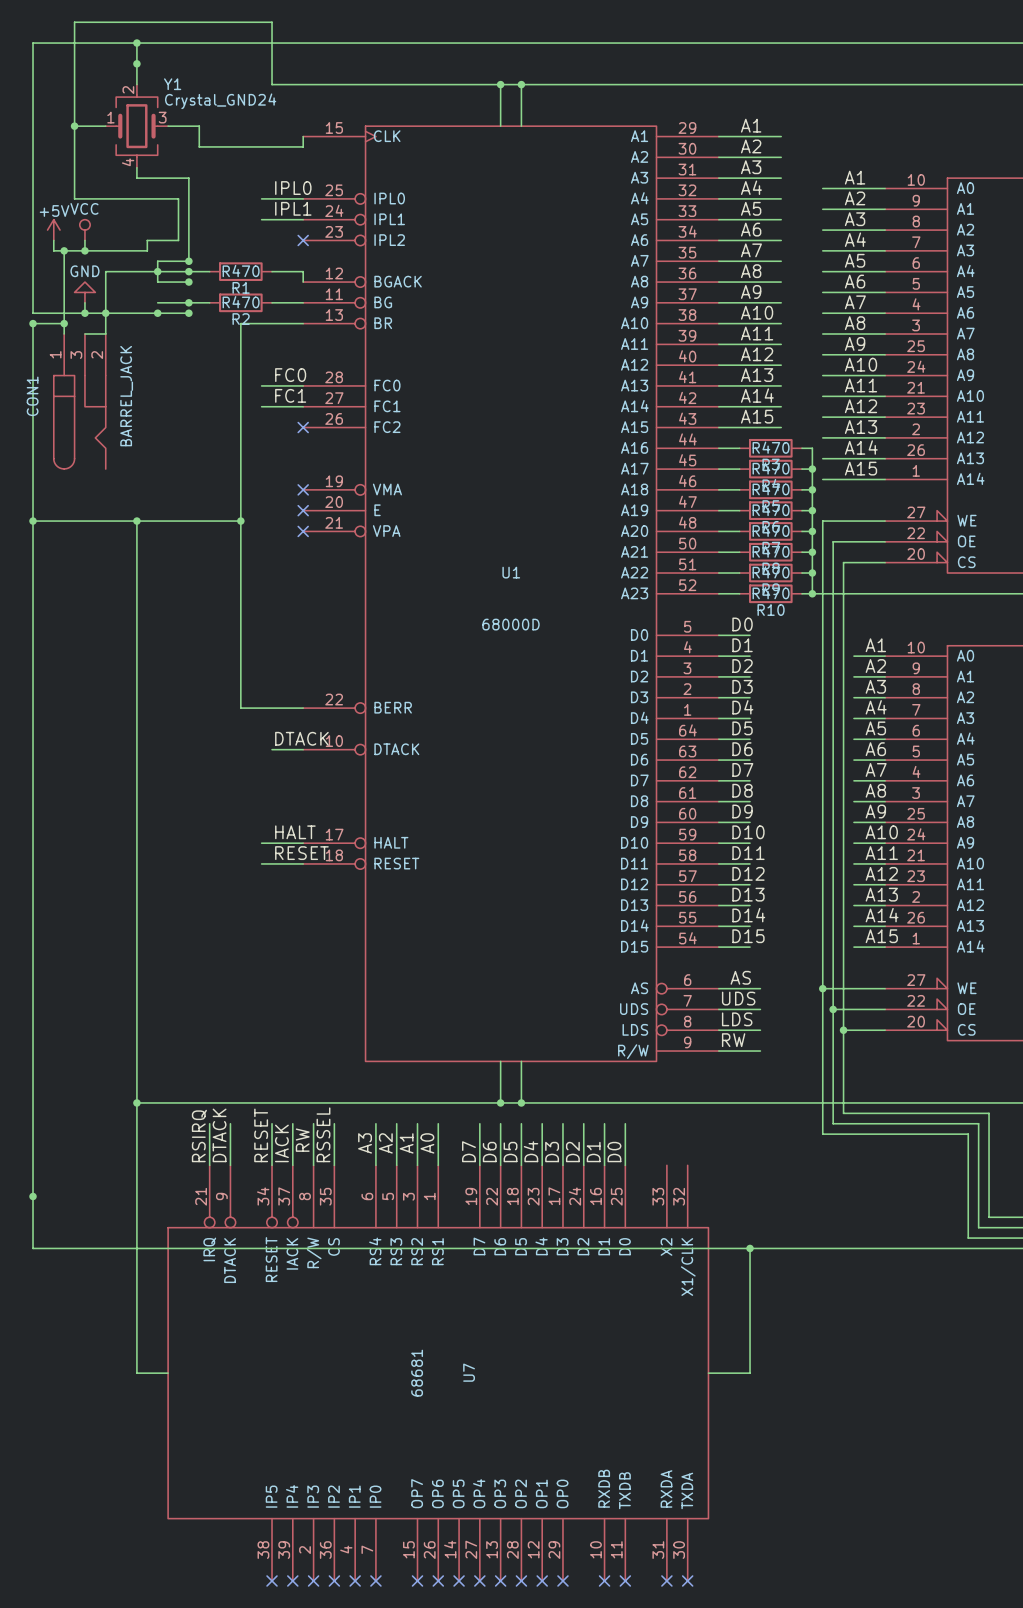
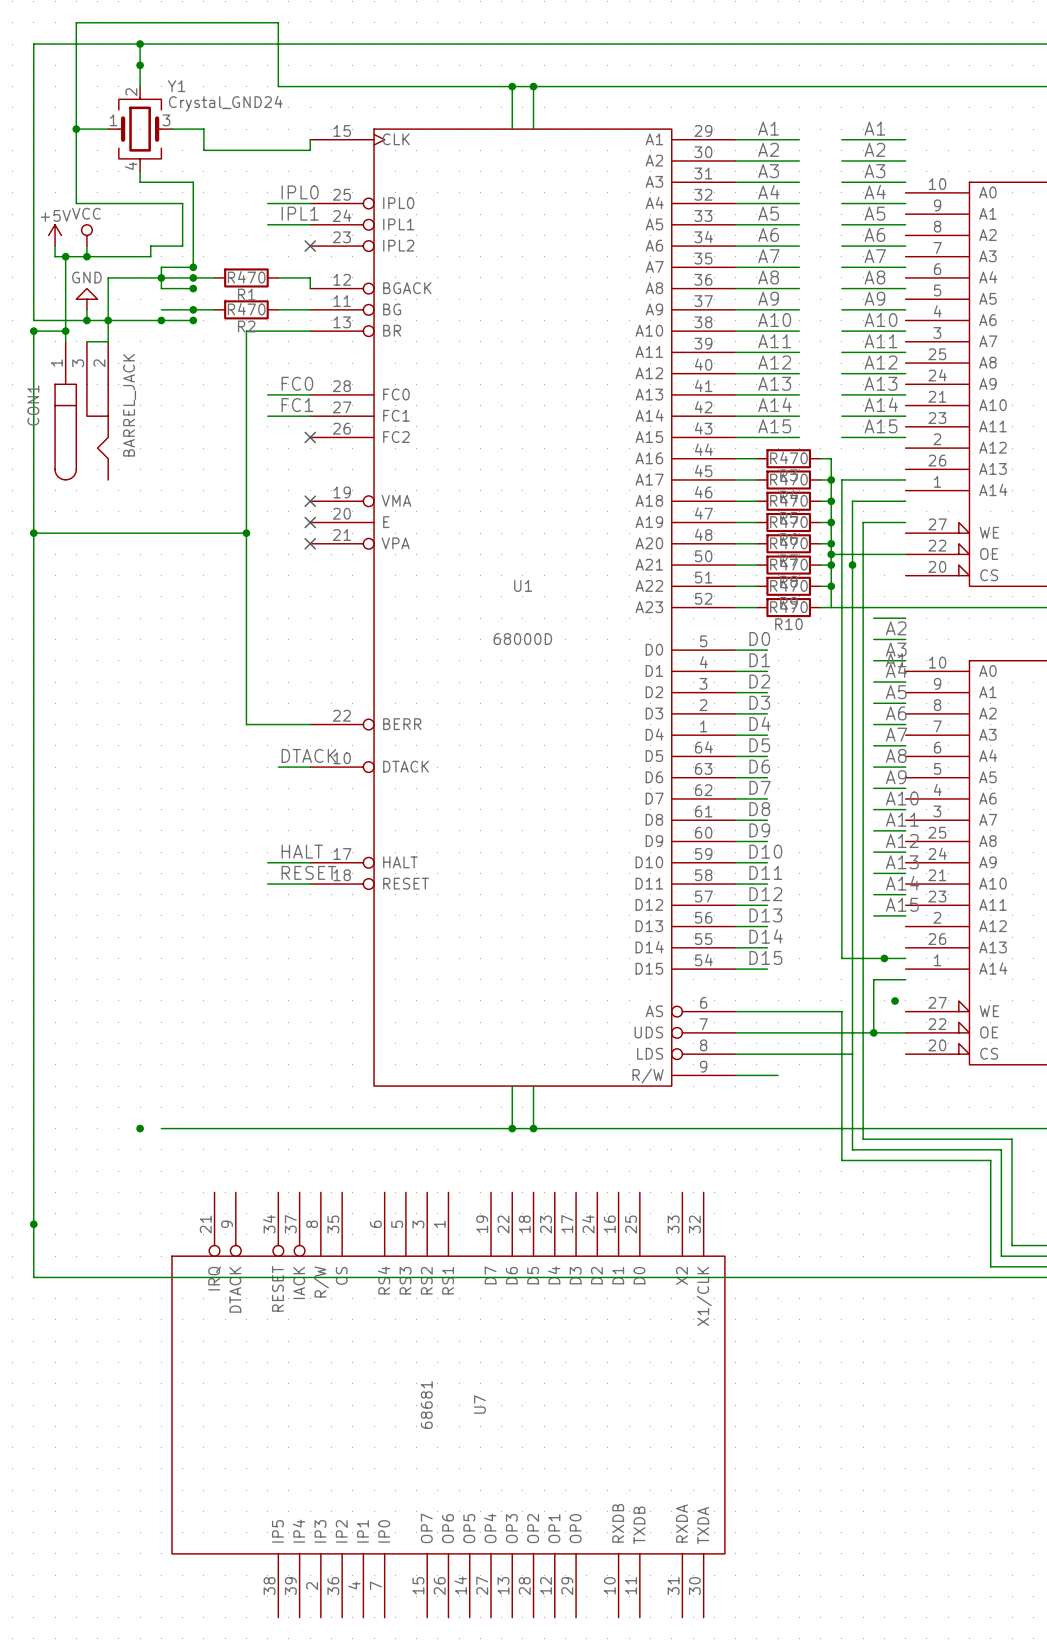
label position: A1 (855, 177) -> A1 (874, 128)
wire: (822, 188) (885, 188) -> (841, 139) (905, 139)
label position: A2 (855, 198) -> A2 (874, 149)
wire: (822, 209) (885, 209) -> (841, 161) (905, 161)
label position: A3 (855, 219) -> A3 (874, 171)
wire: (822, 230) (885, 230) -> (841, 182) (905, 182)
label position: A4 (855, 239) -> A4 (875, 192)
wire: (822, 250) (885, 250) -> (841, 203) (905, 203)
label position: A5 (855, 260) -> A5 (874, 213)
wire: (822, 271) (885, 271) -> (841, 224) (905, 224)
label position: A6 (855, 281) -> A6 (874, 234)
wire: (822, 292) (885, 292) -> (841, 246) (905, 246)
label position: A7 (855, 302) -> A7 (875, 256)
wire: (822, 313) (885, 313) -> (841, 267) (905, 267)
label position: A8 (855, 323) -> A8 (874, 277)
wire: (822, 334) (885, 334) -> (841, 288) (905, 288)
label position: A9 (855, 343) -> A9 (874, 298)
wire: (822, 354) (885, 354) -> (841, 309) (905, 309)
label position: A10 (860, 364) -> A10 (880, 319)
wire: (822, 375) (885, 375) -> (841, 331) (905, 331)
label position: A11 (860, 385) -> A11 (880, 341)
wire: (822, 396) (885, 396) -> (841, 352) (905, 352)
label position: A12 (860, 406) -> A12 (880, 362)
wire: (822, 417) (885, 417) -> (841, 373) (905, 373)
label position: A13 (860, 427) -> A13 (880, 383)
wire: (822, 437) (885, 437) -> (841, 394) (905, 394)
label position: A14 (861, 447) -> A14 (881, 404)
wire: (822, 458) (885, 458) -> (841, 416) (905, 416)
label position: A15 (860, 468) -> A15 (880, 426)
wire: (822, 479) (885, 479) -> (841, 437) (905, 437)
wire: none -> (905, 501) (852, 501) (852, 554) (831, 554)
wire: (136, 521) (136, 1373) (168, 1373) -> none
junction: (136, 521) -> none
wire: (822, 521) (885, 521) -> (841, 533) (841, 479) (905, 479)
junction: none -> (831, 554)
junction: none -> (852, 565)
wire: (843, 562) (885, 562) -> (863, 575) (863, 522) (905, 522)
junction: (812, 593) -> none
wire: (853, 656) (885, 656) -> (873, 618) (905, 618)
label position: A2 (875, 666) -> A2 (896, 628)
wire: (853, 676) (885, 676) -> (873, 639) (905, 639)
label position: A3 (875, 686) -> A3 (896, 649)
wire: (853, 697) (885, 697) -> (873, 660) (905, 660)
label position: A4 (876, 707) -> A4 (896, 670)
wire: (853, 718) (885, 718) -> (873, 682) (905, 682)
label position: A5 (875, 728) -> A5 (896, 692)
wire: (853, 739) (885, 739) -> (873, 703) (905, 703)
label position: A6 (875, 749) -> A6 (896, 713)
wire: (853, 760) (885, 760) -> (873, 724) (905, 724)
label position: A7 (876, 769) -> A7 (896, 734)
wire: (853, 780) (885, 780) -> (873, 745) (905, 745)
label position: A8 (875, 790) -> A8 (896, 755)
wire: (853, 801) (885, 801) -> (873, 767) (905, 767)
label position: A9 (875, 811) -> A9 (896, 777)
wire: (853, 822) (885, 822) -> (873, 788) (905, 788)
label position: A10 (881, 832) -> A10 (902, 798)
wire: (853, 843) (885, 843) -> (873, 809) (905, 809)
label position: A11 (881, 853) -> A11 (902, 819)
wire: (853, 863) (885, 863) -> (873, 830) (905, 830)
label position: A12 (881, 873) -> A12 (902, 841)
wire: (853, 884) (885, 884) -> (873, 852) (905, 852)
label position: A13 (881, 894) -> A13 (902, 862)
wire: (853, 905) (885, 905) -> (873, 873) (905, 873)
label position: A14 (882, 915) -> A14 (902, 883)
wire: (853, 926) (885, 926) -> (873, 894) (905, 894)
wire: (822, 936) (822, 988) (885, 988) -> (841, 958) (905, 958)
junction: none -> (884, 958)
label position: A15 (881, 936) -> A15 (902, 904)
wire: (853, 947) (885, 947) -> (873, 915) (905, 915)
wire: none -> (905, 979) (873, 979) (873, 1032)
label: AS (740, 977) -> none
junction: none -> (895, 1000)
wire: none -> (778, 1011) (841, 1011)
junction: (822, 988) -> none
label: UDS (738, 998) -> none
wire: none -> (778, 1032) (852, 1032)
junction: (833, 1009) -> none
junction: none -> (873, 1032)
label: LDS (737, 1019) -> none
wire: none -> (778, 1054) (852, 1054)
wire: (843, 1030) (885, 1030) -> none
junction: (843, 1030) -> none
label: RW (733, 1040) -> none
wire: (136, 1102) (157, 1102) -> none
wire: (209, 1123) (209, 1165) -> none
wire: (230, 1123) (230, 1165) -> none
wire: (272, 1123) (272, 1165) -> none
wire: (292, 1123) (292, 1165) -> none
wire: (313, 1123) (313, 1165) -> none
wire: (334, 1123) (334, 1165) -> none
wire: (375, 1123) (375, 1165) -> none
wire: (396, 1123) (396, 1165) -> none
wire: (417, 1123) (417, 1165) -> none
wire: (438, 1123) (438, 1165) -> none
wire: (479, 1123) (479, 1165) -> none
wire: (500, 1123) (500, 1165) -> none
wire: (521, 1123) (521, 1165) -> none
wire: (542, 1123) (542, 1165) -> none
wire: (562, 1123) (562, 1165) -> none
wire: (583, 1123) (583, 1165) -> none
wire: (604, 1123) (604, 1165) -> none
wire: (625, 1123) (625, 1165) -> none
label: RSSEL (323, 1134) -> none
label: DTACK (219, 1135) -> none
label: RESET (261, 1135) -> none
label: RSIRQ (199, 1136) -> none
label: RW (302, 1140) -> none
label: IACK (281, 1143) -> none
label: A3 (365, 1143) -> none
label: A2 (385, 1143) -> none
label: A1 (406, 1143) -> none
label: A0 (427, 1143) -> none
label: D7 (468, 1151) -> none
label: D4 (531, 1151) -> none
label: D6 (489, 1152) -> none
label: D5 (510, 1152) -> none
label: D3 (552, 1152) -> none
label: D2 (572, 1152) -> none
label: D1 (593, 1152) -> none
label: D0 (614, 1152) -> none
wire: (750, 1248) (750, 1373) (708, 1373) -> none
junction: (750, 1248) -> none
no-connect mark: (272, 1580) -> none
no-connect mark: (292, 1580) -> none
no-connect mark: (313, 1580) -> none
no-connect mark: (334, 1580) -> none
no-connect mark: (355, 1580) -> none
no-connect mark: (375, 1580) -> none
no-connect mark: (417, 1580) -> none
no-connect mark: (438, 1580) -> none
no-connect mark: (459, 1580) -> none
no-connect mark: (479, 1580) -> none
no-connect mark: (500, 1580) -> none
no-connect mark: (521, 1580) -> none
no-connect mark: (542, 1580) -> none
no-connect mark: (562, 1580) -> none
no-connect mark: (604, 1580) -> none
no-connect mark: (625, 1580) -> none
no-connect mark: (666, 1580) -> none
no-connect mark: (687, 1580) -> none

